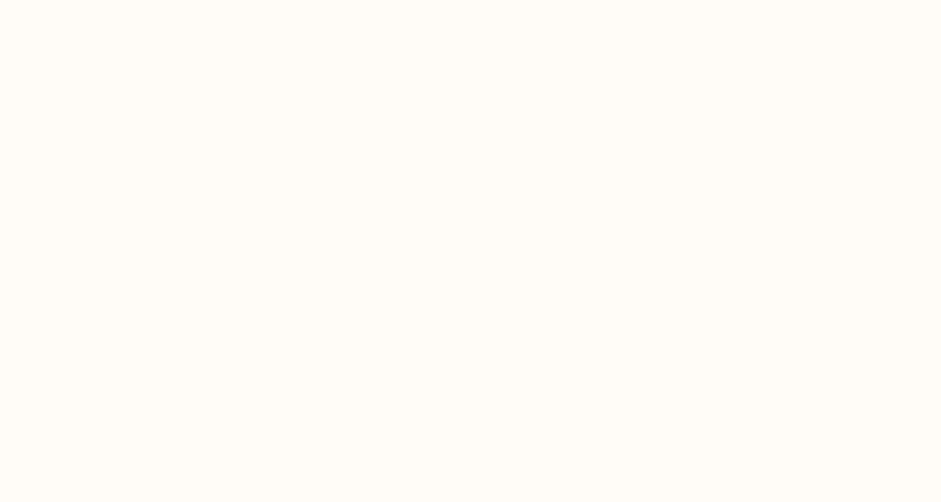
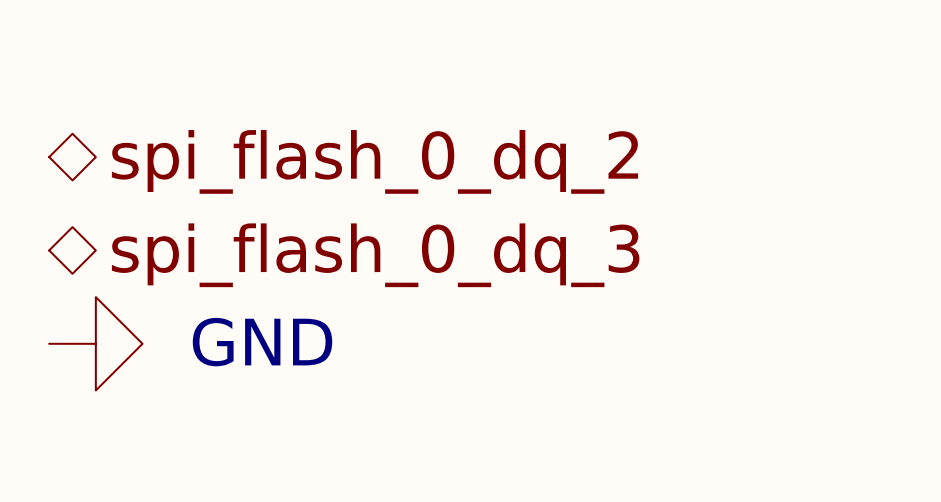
hierarchical label: none -> spi_flash_0_dq_2 (375, 161)
hierarchical label: none -> spi_flash_0_dq_3 (375, 255)
power symbol: none -> GND (95, 343)

